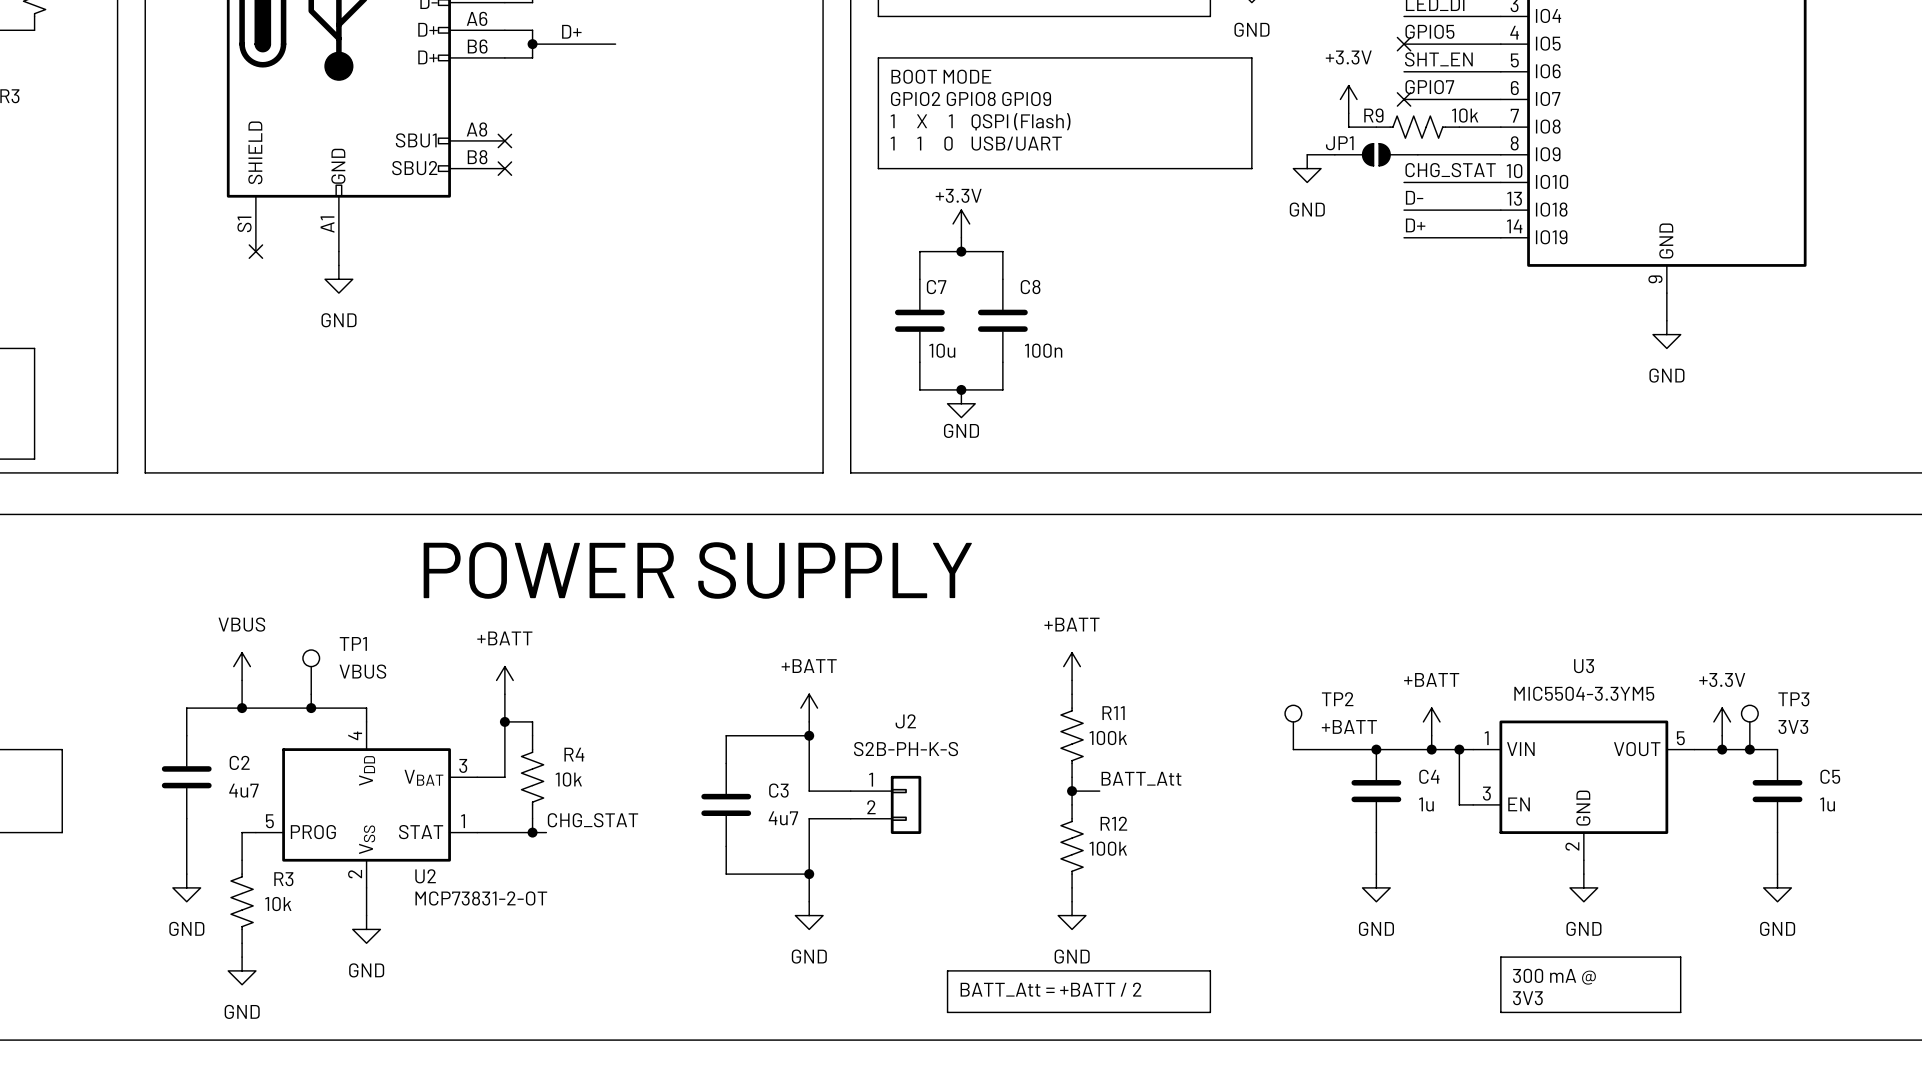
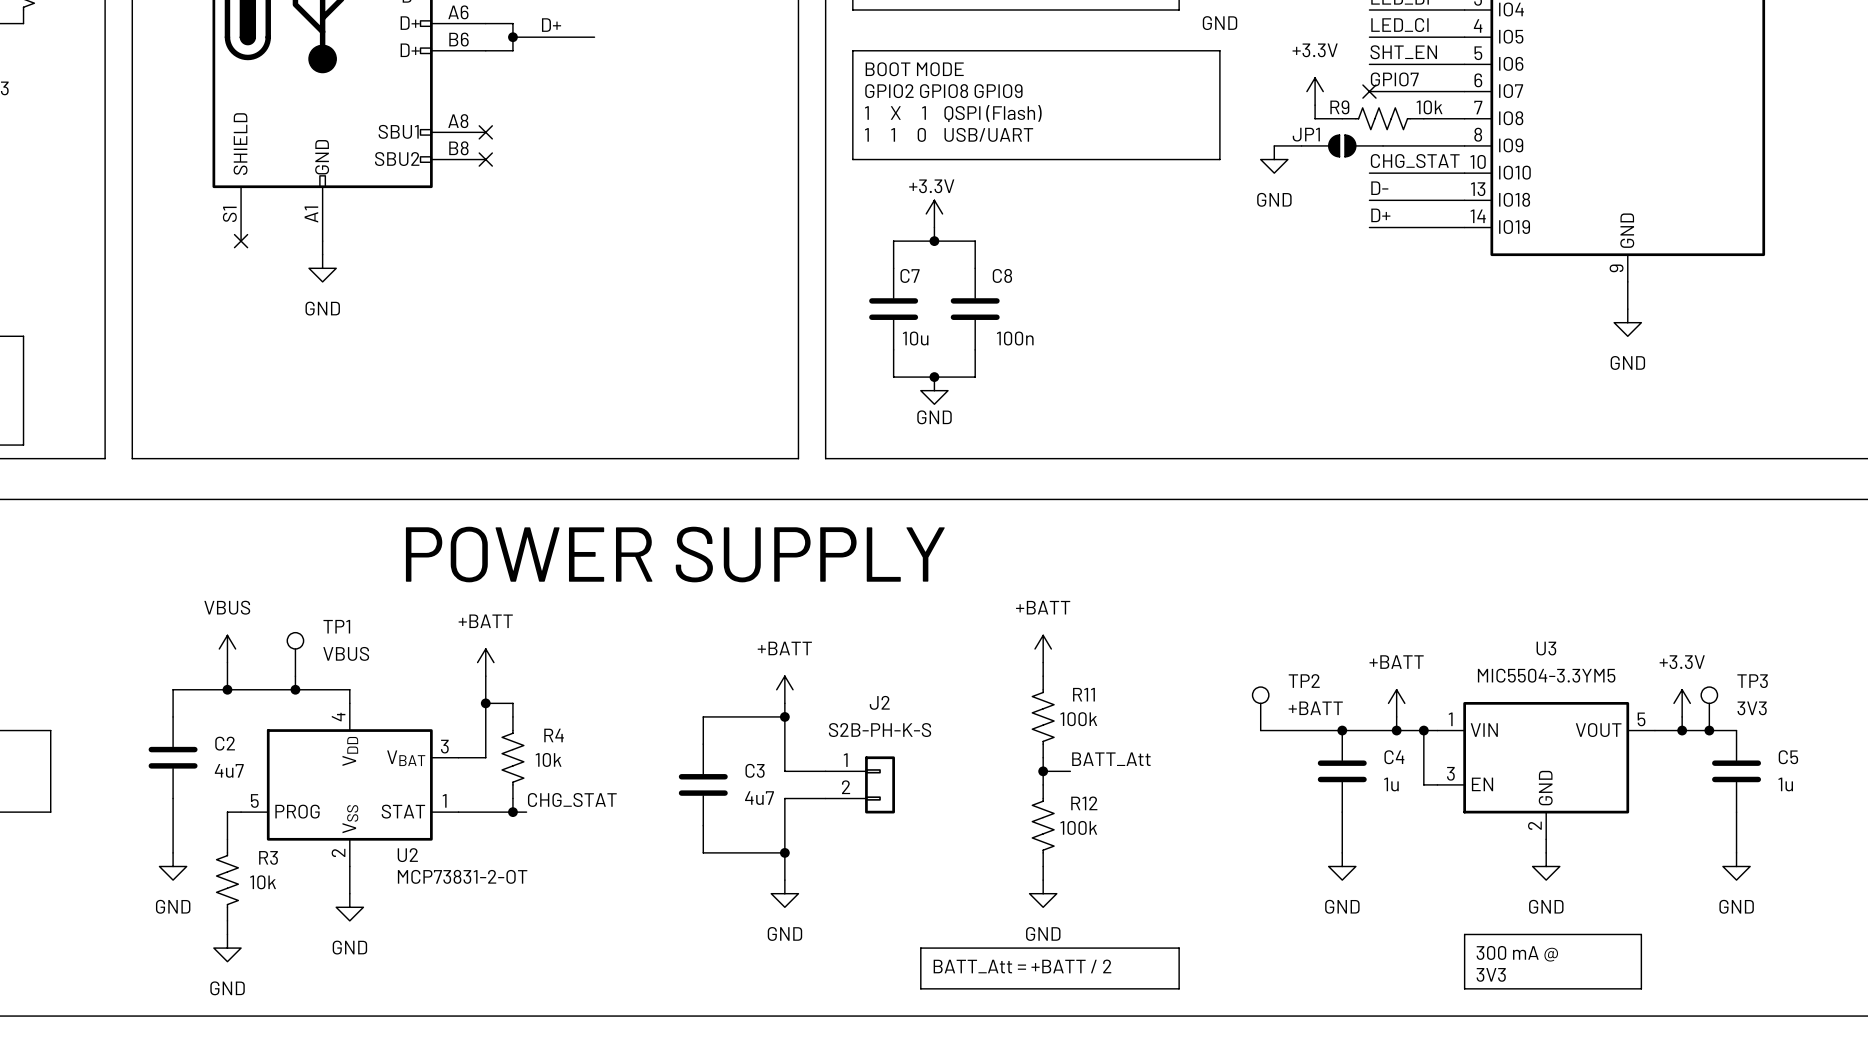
label: GPIO5 (1429, 31) -> LED_CI (1399, 25)
no-connect mark: (1404, 44) -> none

